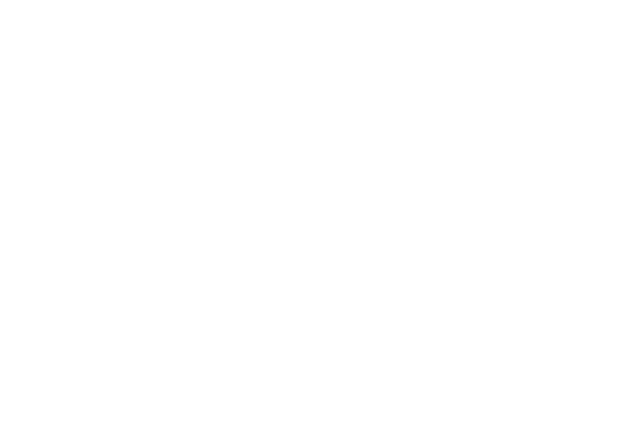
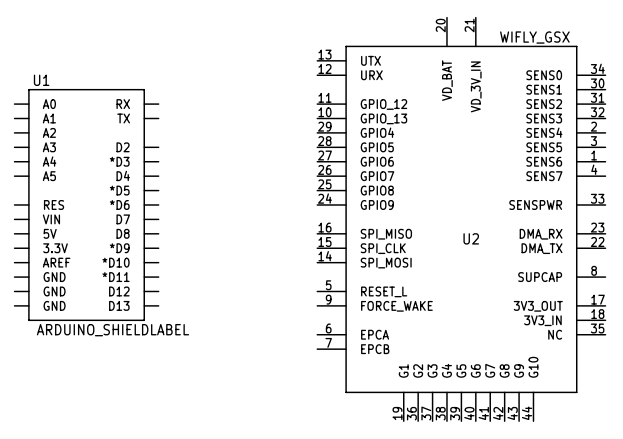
U1: none -> ARDUINO_SHIELDLABEL (86, 204)
U2: none -> WIFLY_GSX (461, 219)

